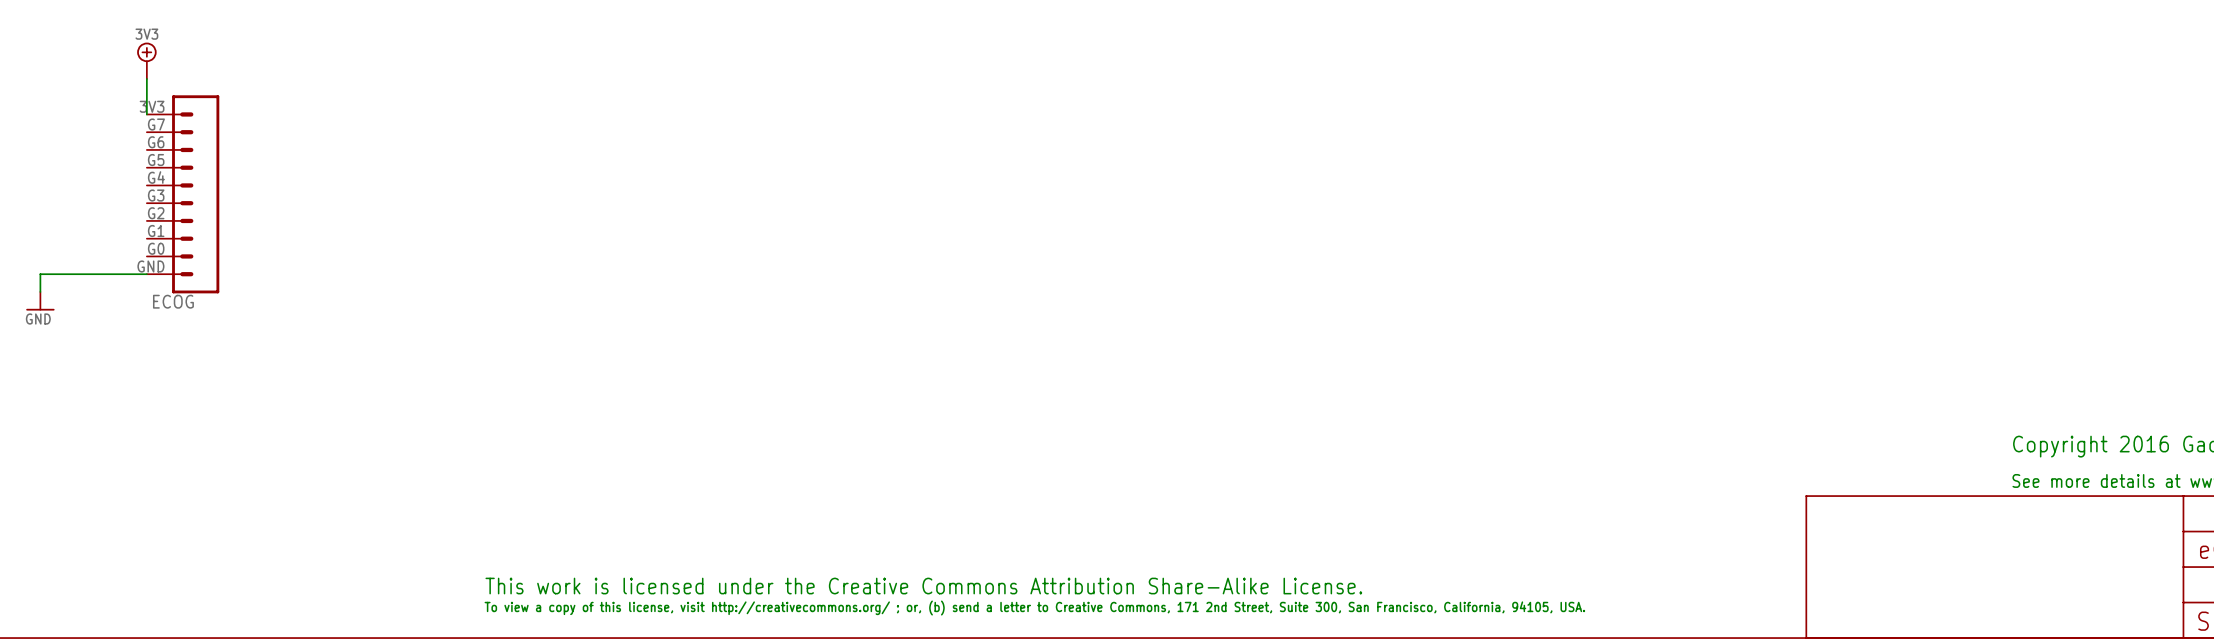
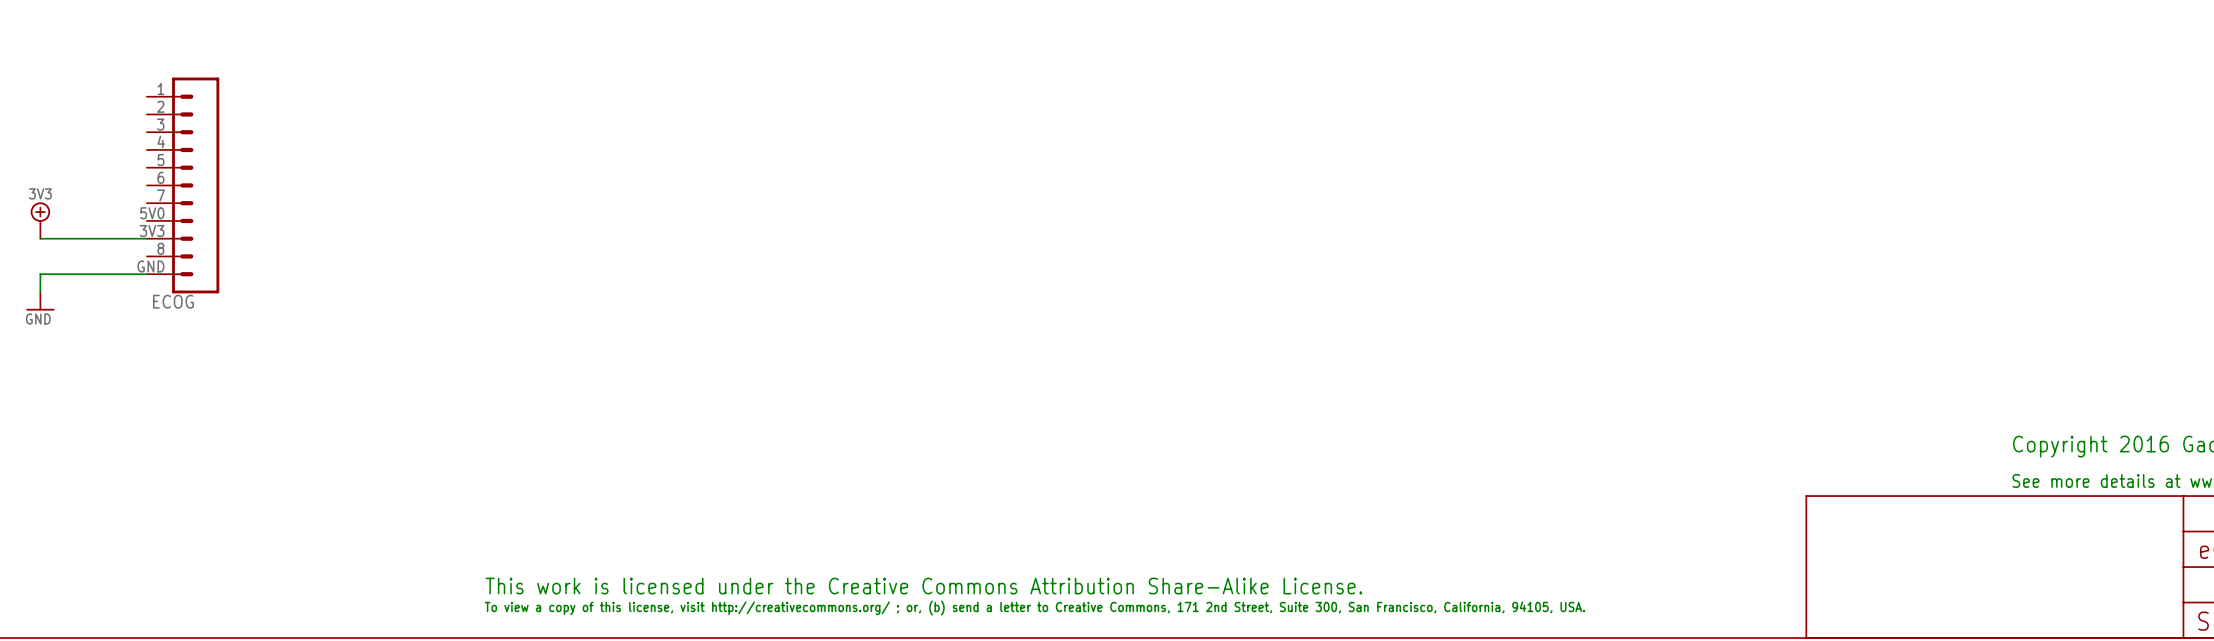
power symbol: 3V3 (146, 60) -> none
wire: (146, 78) (146, 114) -> none
ECOG: none -> (183, 185)
ECOG: (183, 194) -> none
power symbol: none -> 3V3 (40, 220)
wire: none -> (40, 238) (146, 238)

